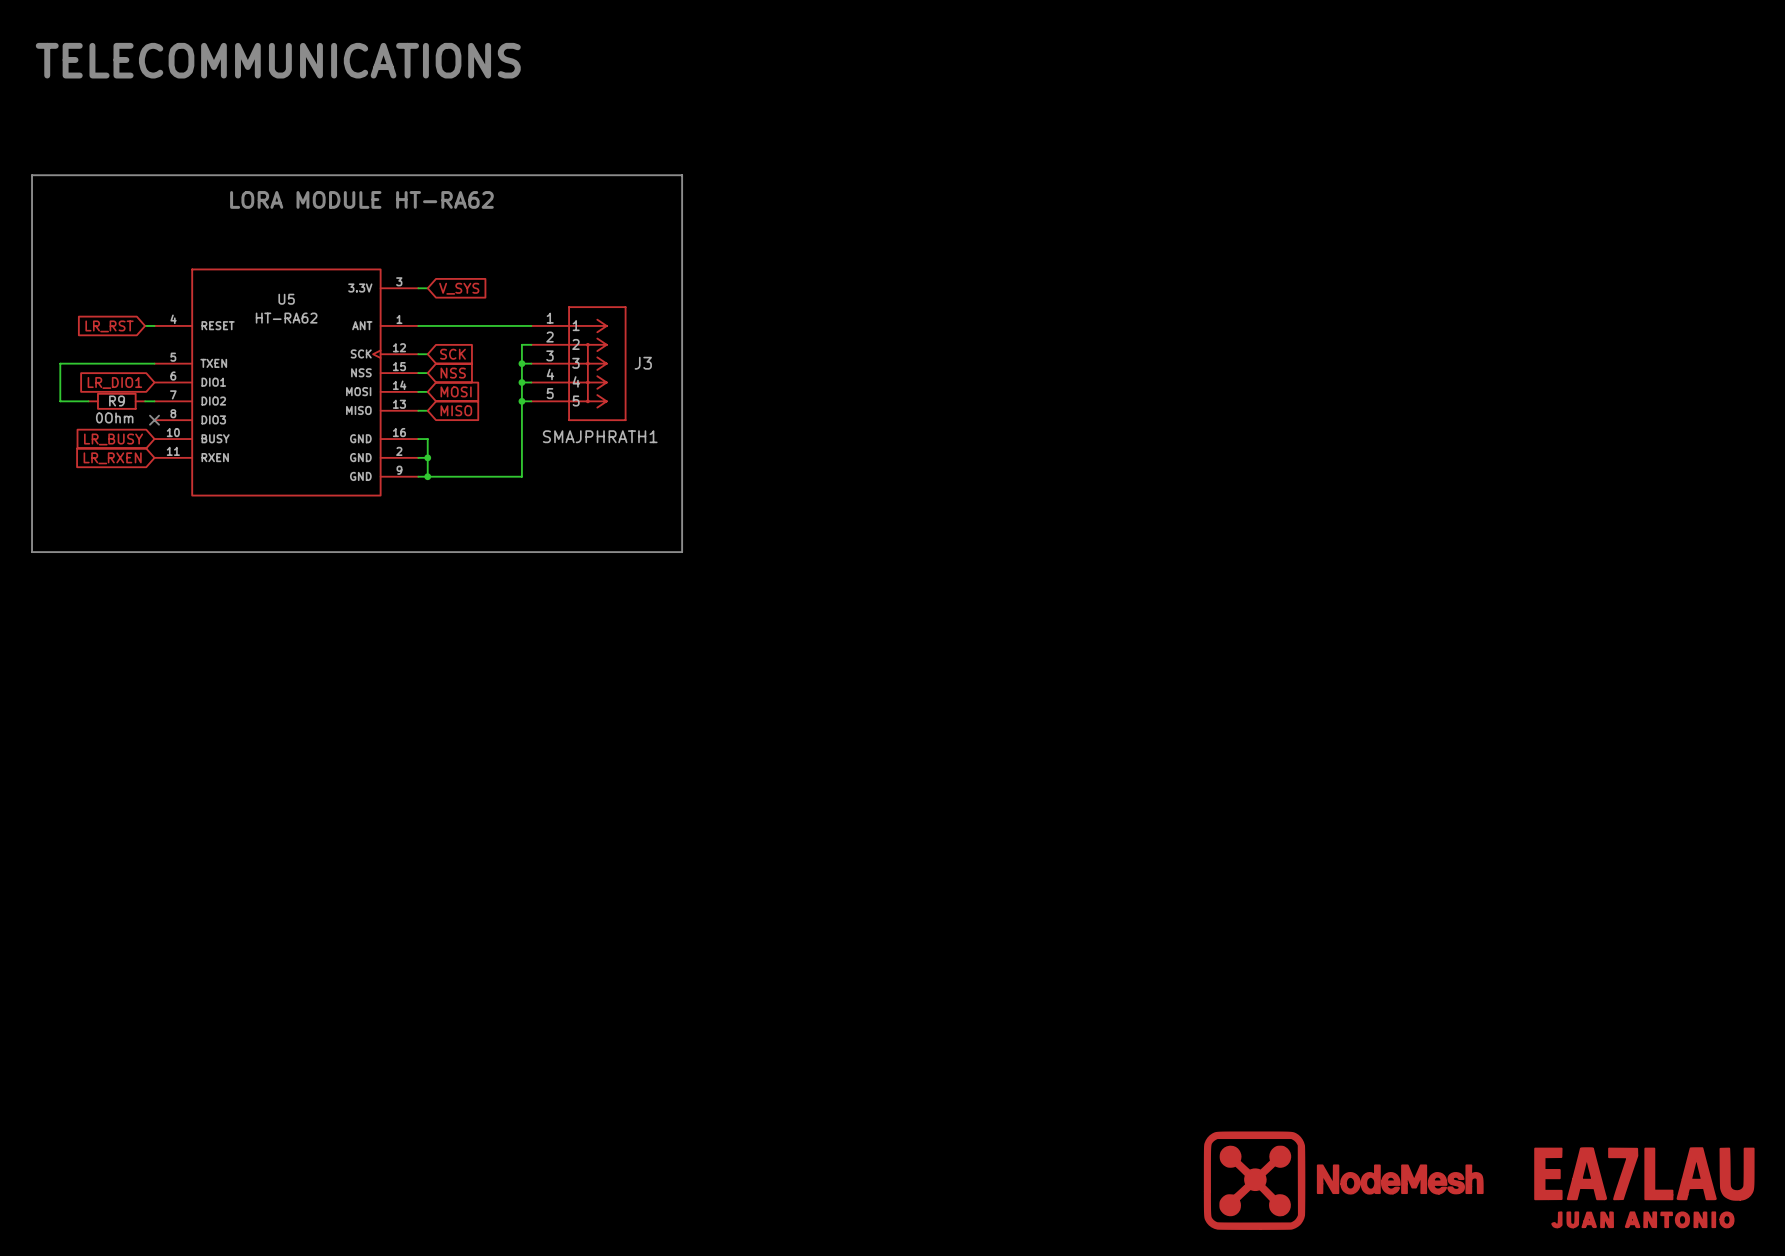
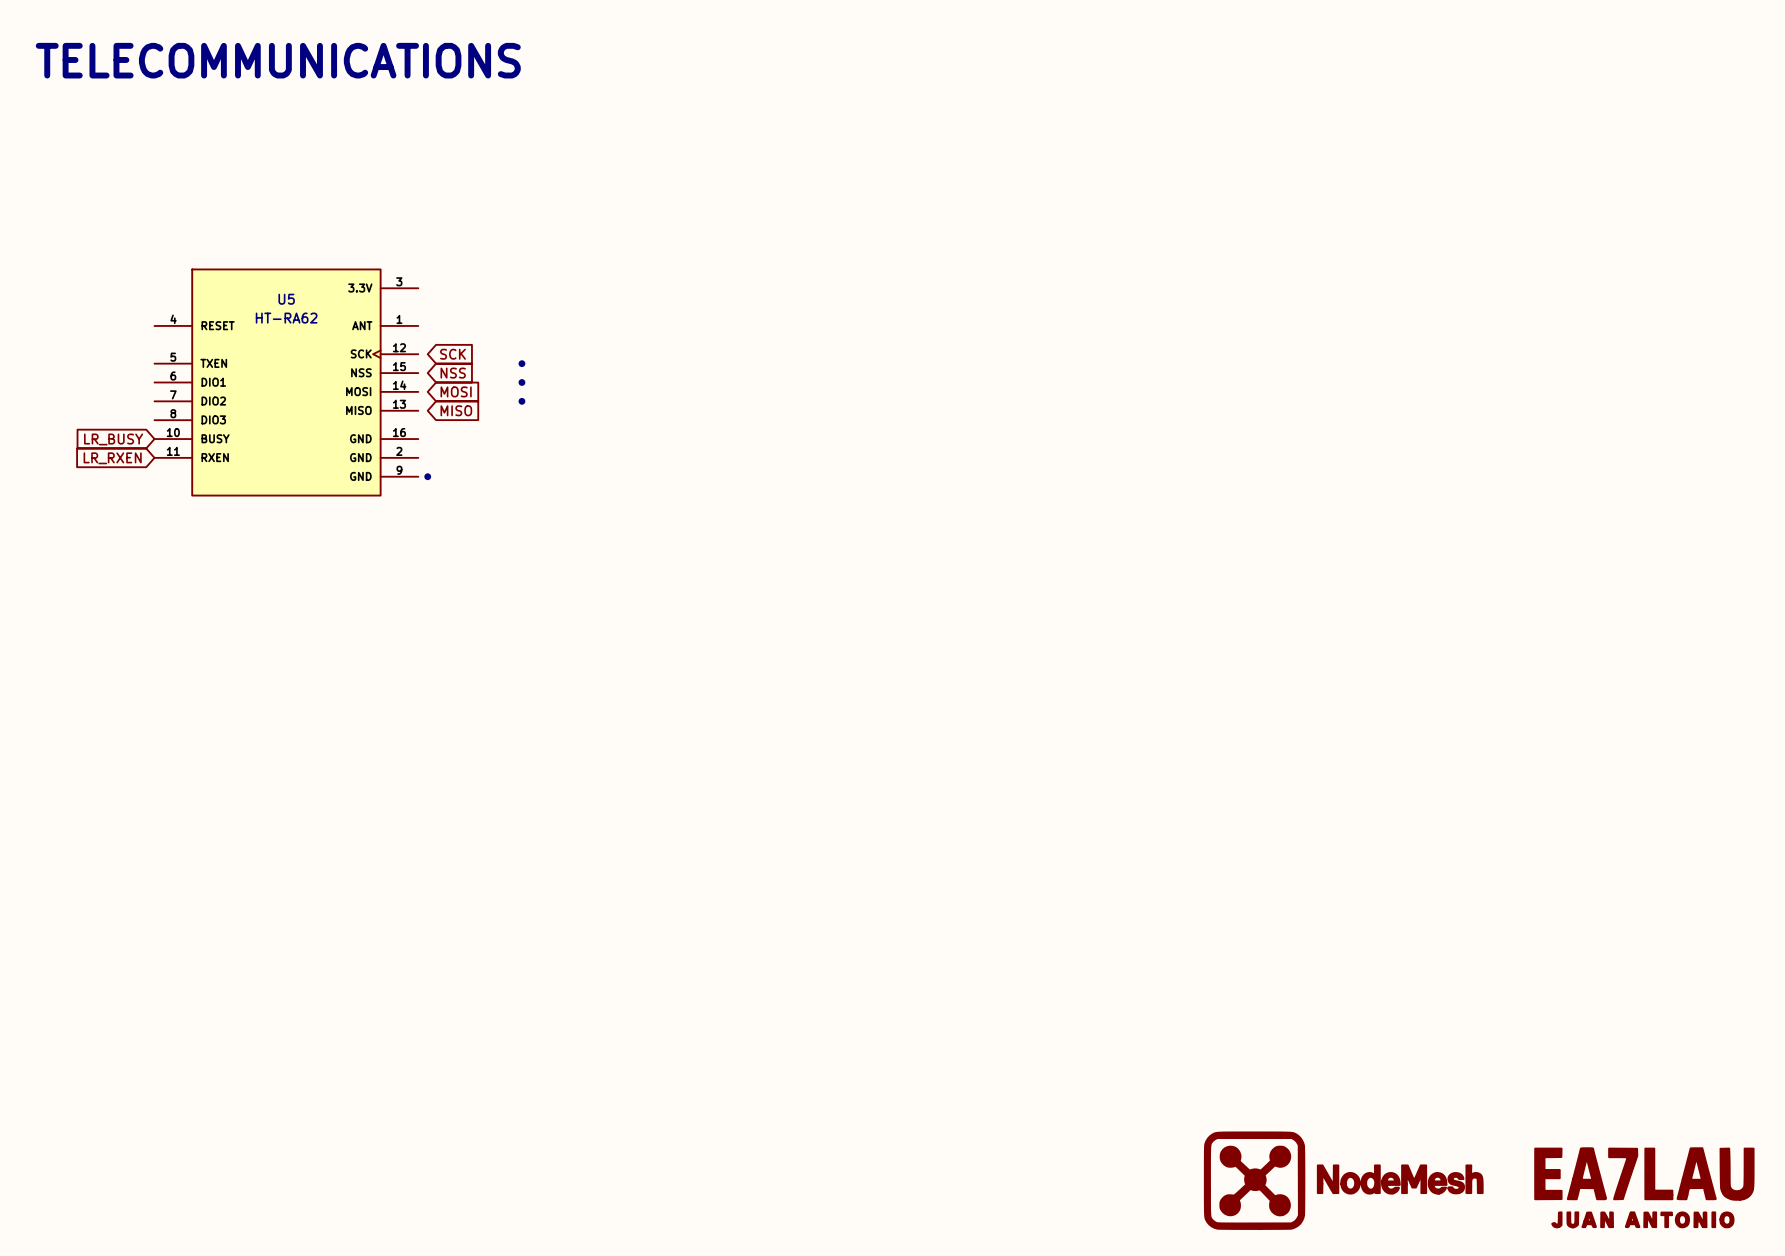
line: (32, 175) (682, 175) (682, 552) (32, 552) (32, 175) -> none
text: LORA MODULE HT-RA62 (361, 199) -> none
wire: (418, 288) (427, 288) -> none
global label: V_SYS (459, 288) -> none
wire: (145, 325) (154, 325) -> none
wire: (418, 325) (531, 325) -> none
global label: LR_RST (109, 326) -> none
wire: (531, 344) (521, 344) (521, 476) (418, 476) -> none
wire: (418, 354) (427, 354) -> none
wire: (154, 363) (60, 363) (60, 401) (88, 401) -> none
wire: (521, 363) (531, 363) -> none
J3: SMAJPHRATH1 (578, 363) -> none
wire: (418, 373) (427, 373) -> none
global label: LR_DIO1 (114, 382) -> none
wire: (521, 382) (531, 382) -> none
wire: (418, 391) (427, 391) -> none
R9: 0Ohm (116, 401) -> none
wire: (145, 401) (154, 401) -> none
wire: (521, 401) (531, 401) -> none
wire: (418, 410) (427, 410) -> none
no-connect mark: (154, 420) -> none
wire: (418, 439) (427, 439) (427, 476) -> none
wire: (418, 457) (427, 457) -> none
junction: (427, 457) -> none

